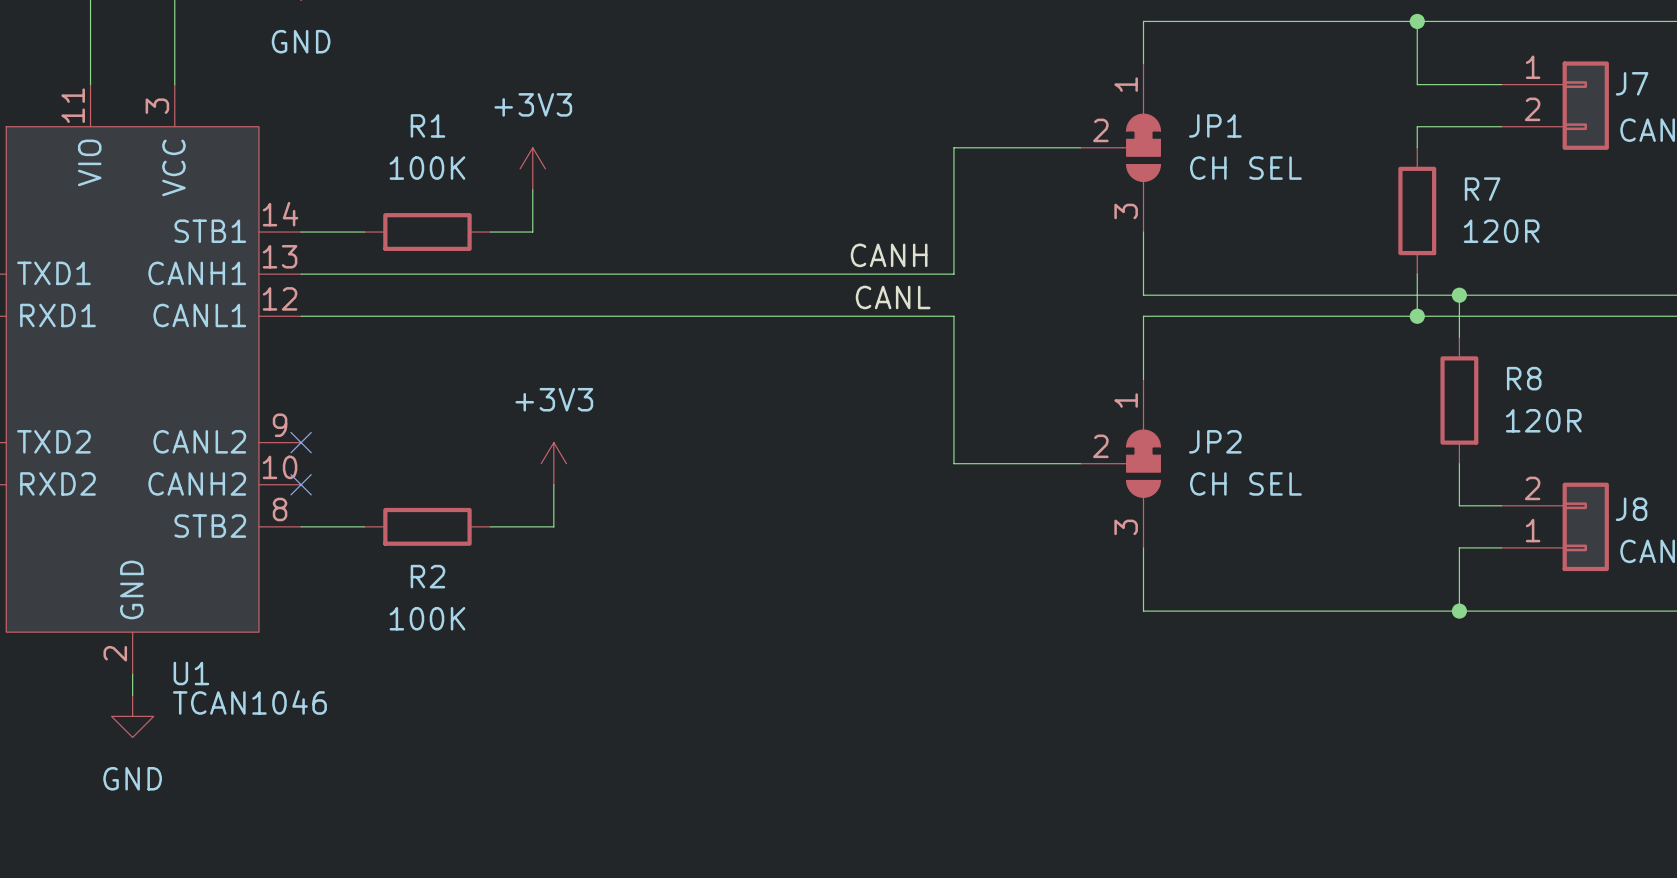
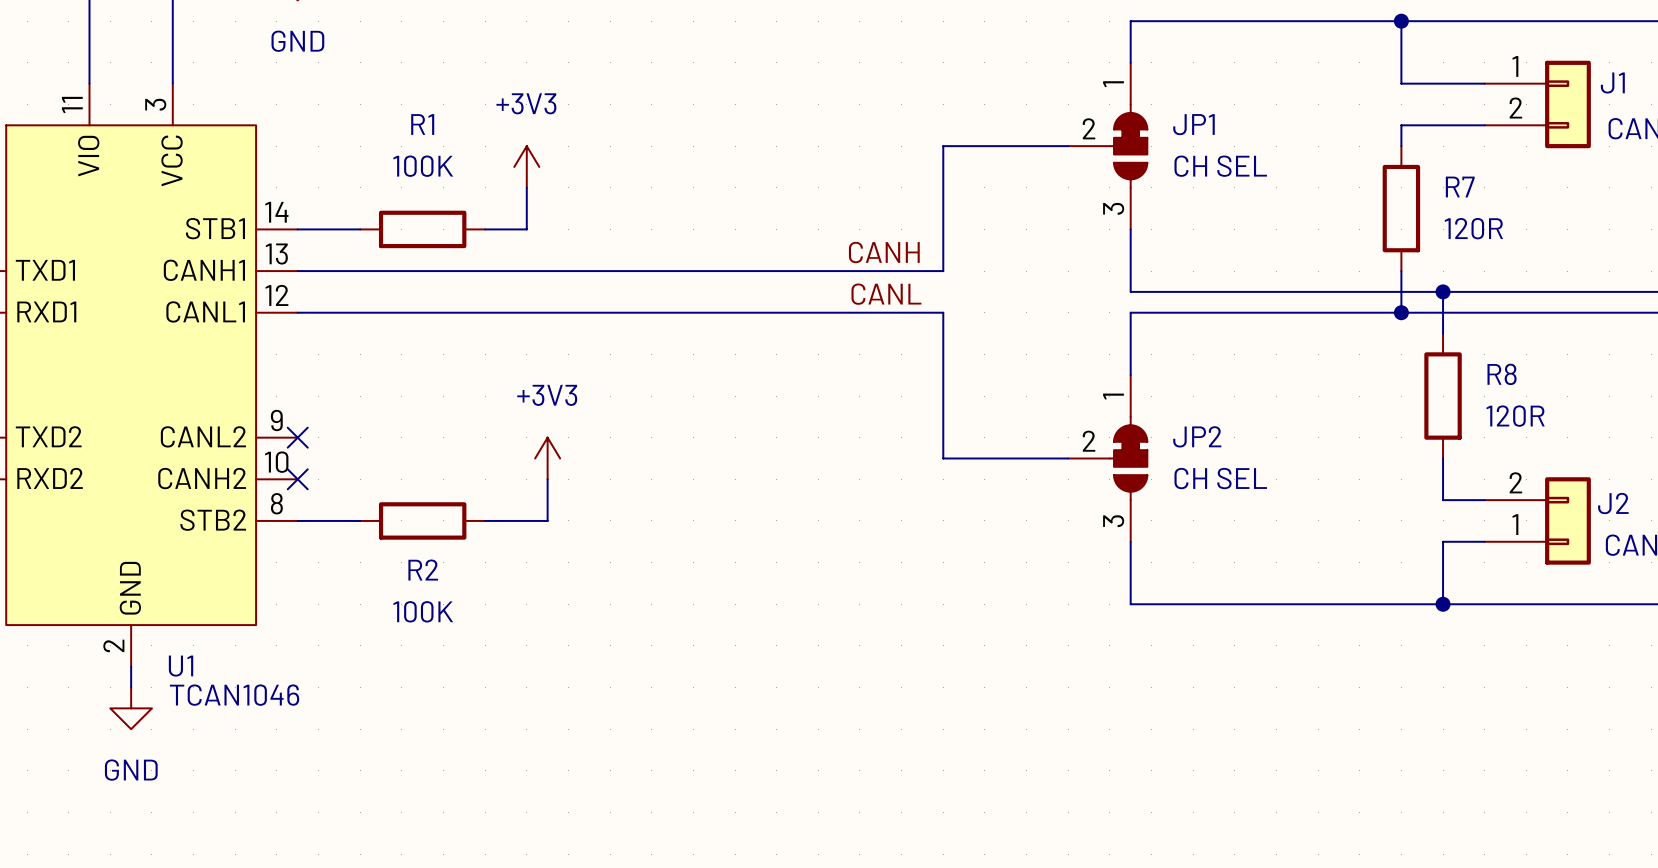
J7 name: J7 (1632, 83) -> J1 (1612, 83)
J8 name: J8 (1631, 509) -> J2 (1613, 503)

